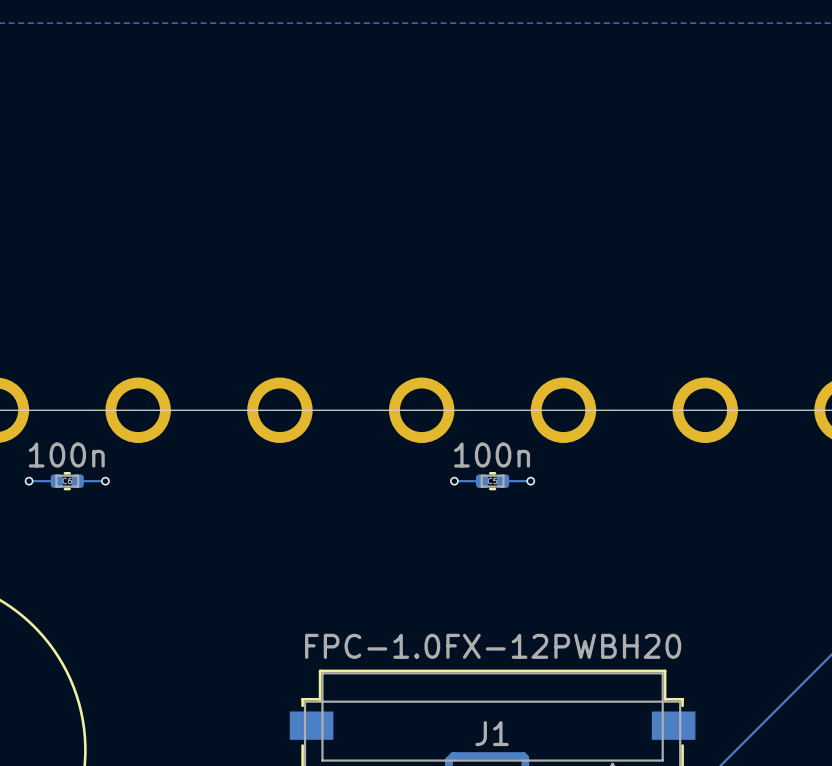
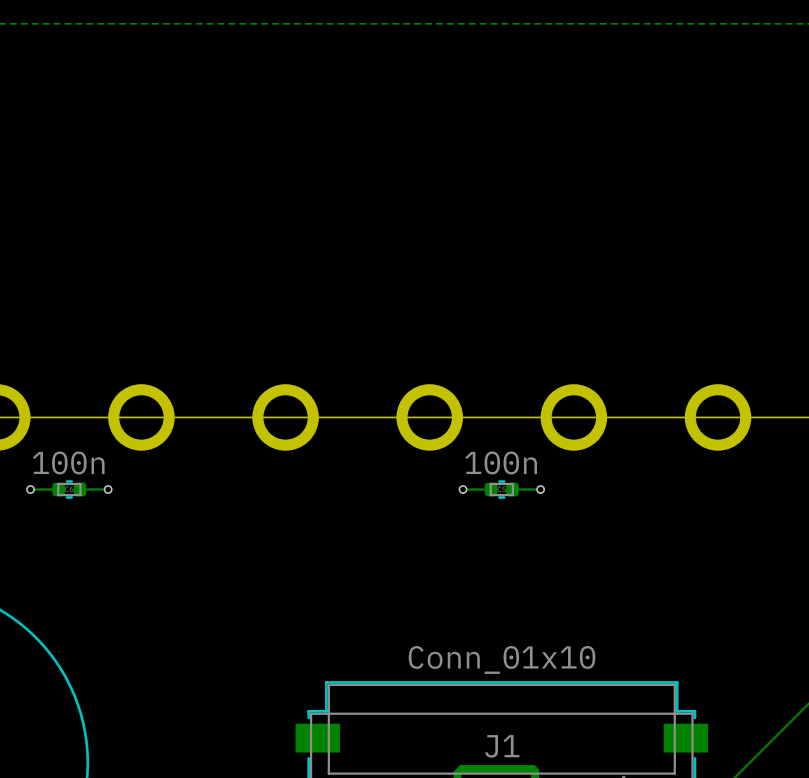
J1 value: FPC-1.0FX-12PWBH20 (493, 646) -> Conn_01x10 (502, 659)

